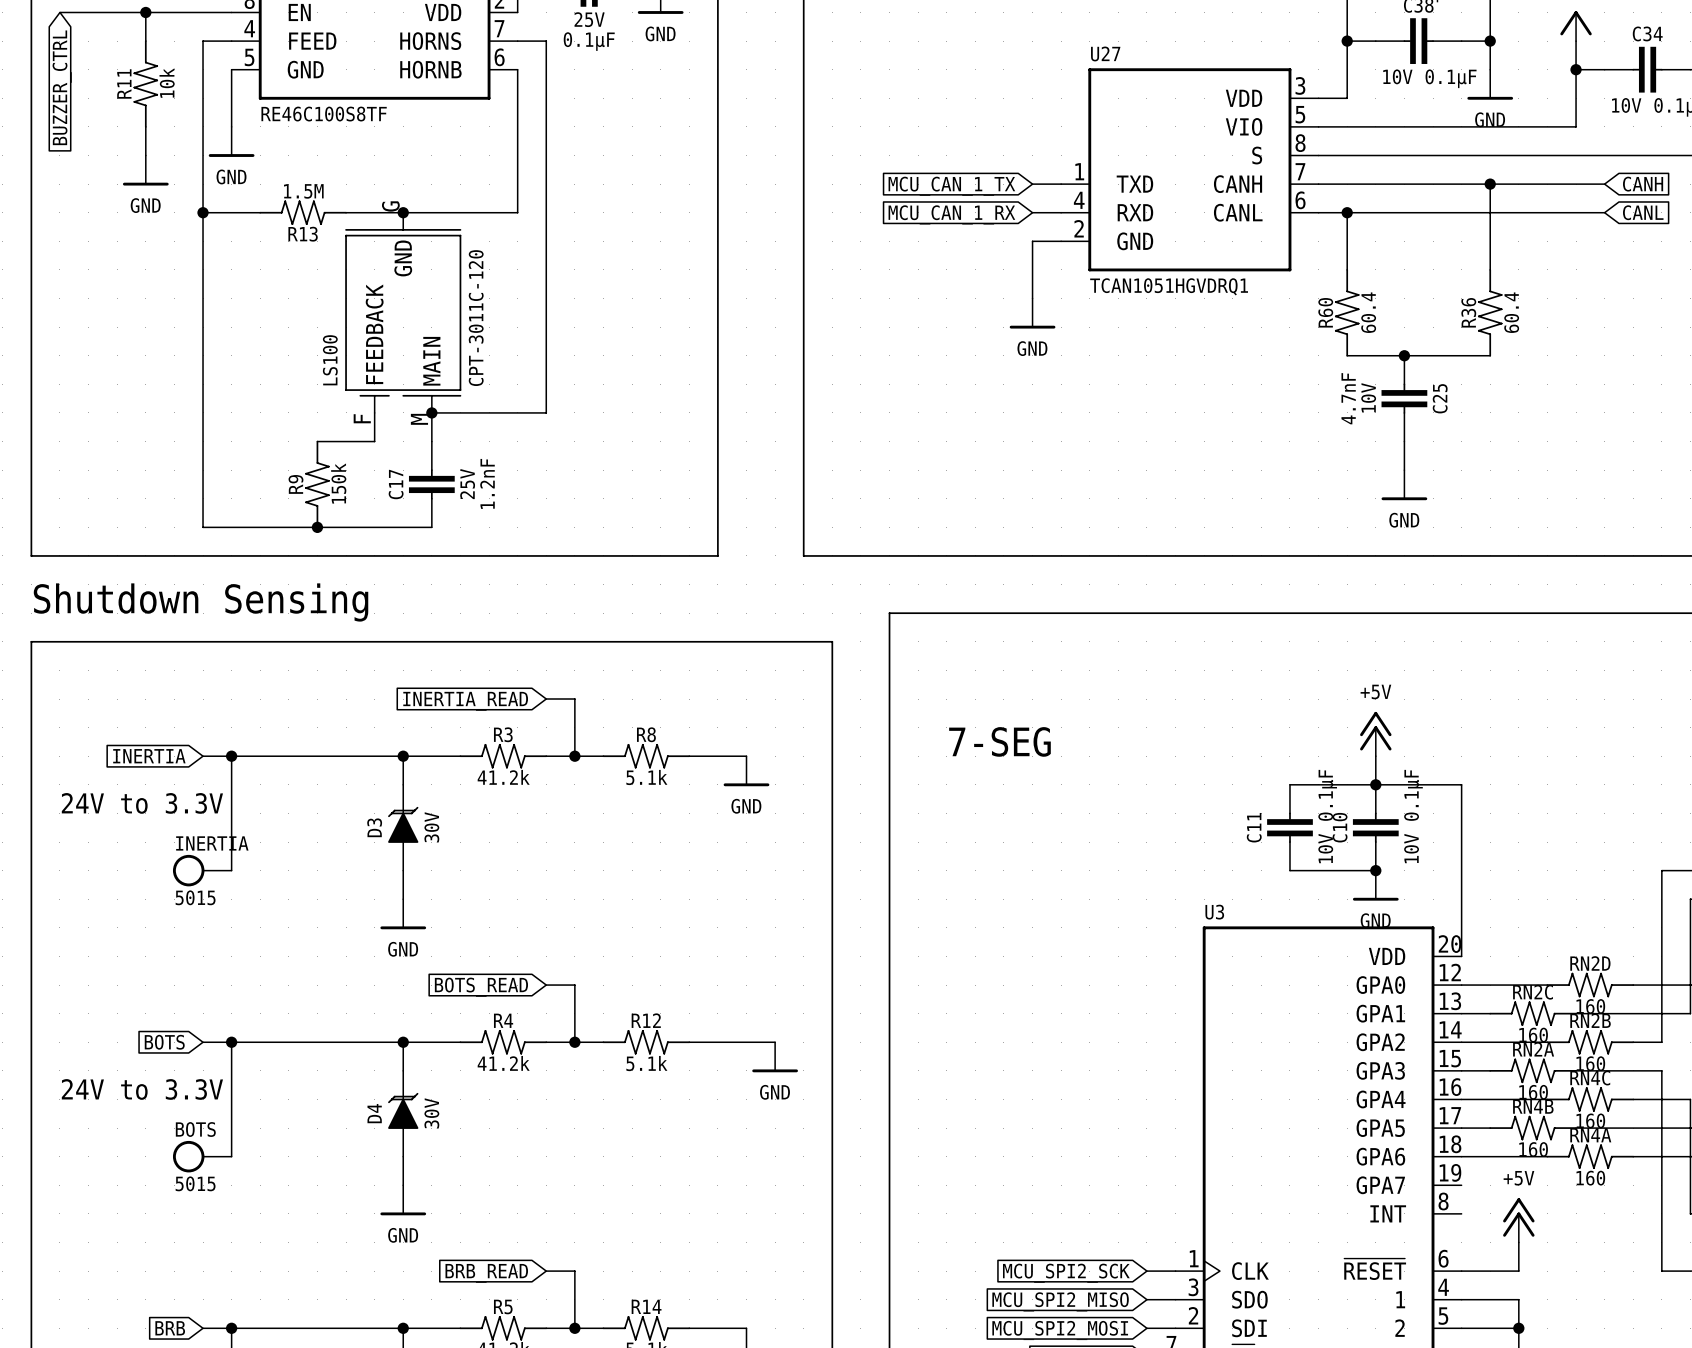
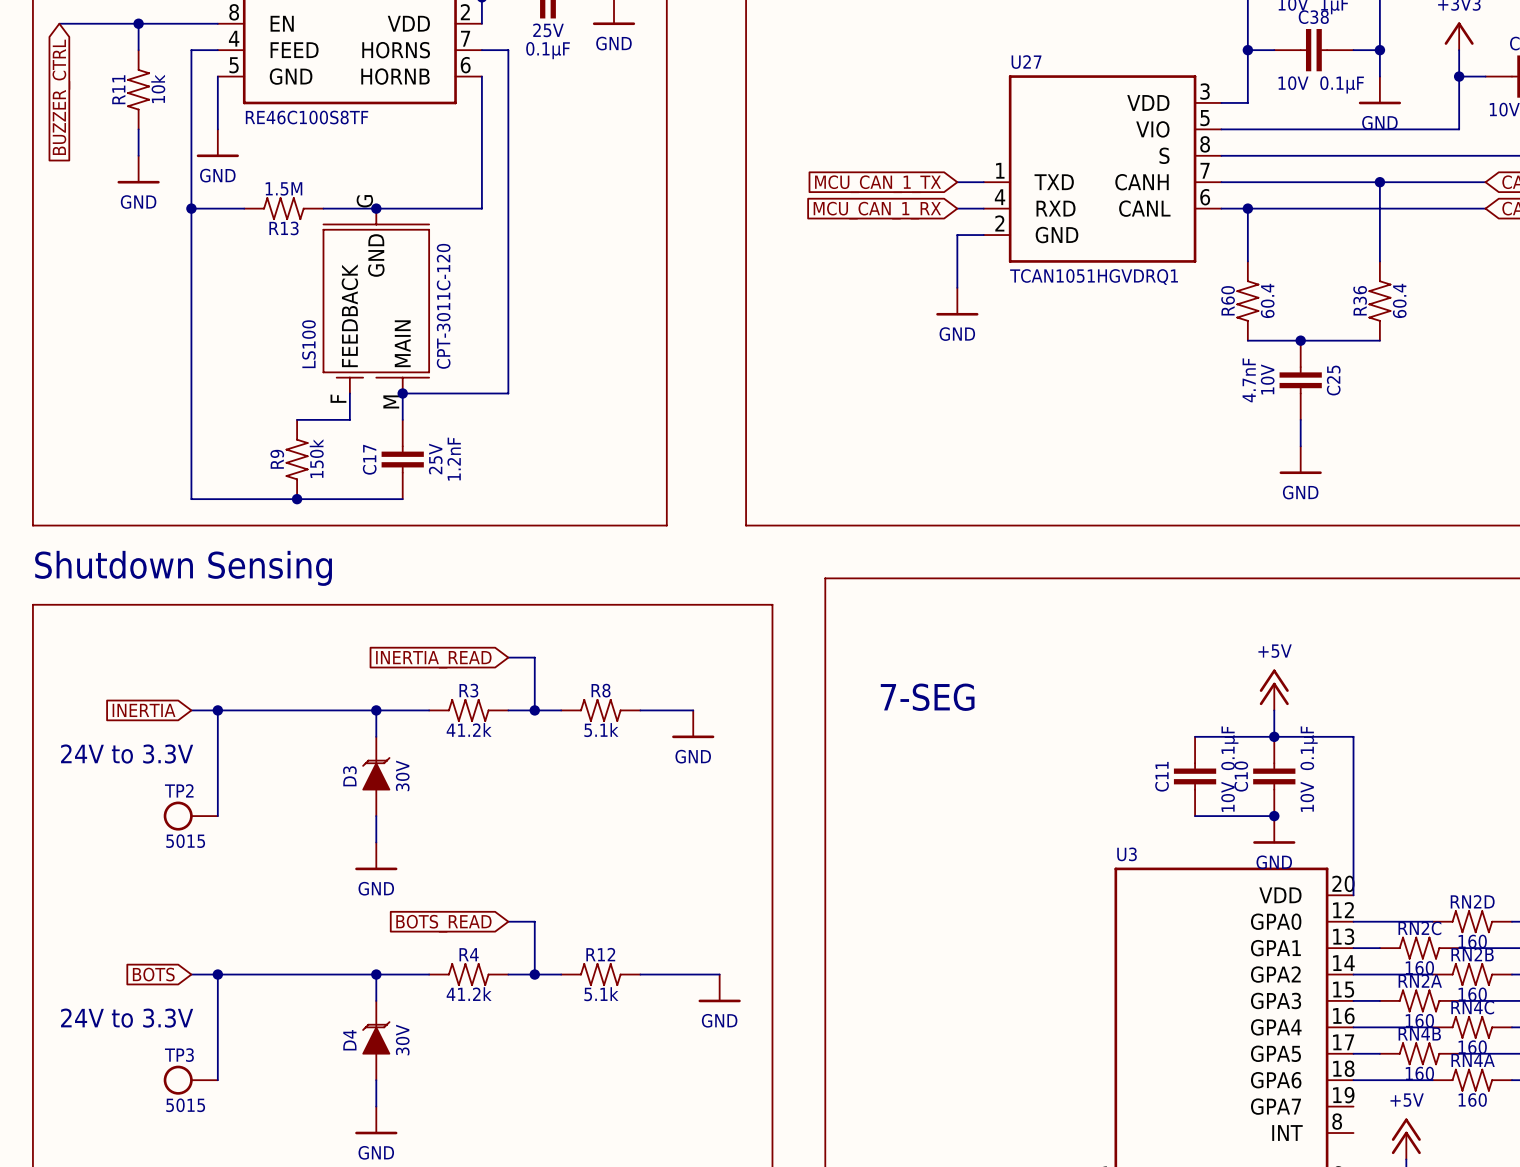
INERTIA name: INERTIA (212, 843) -> TP2 (179, 790)
BOTS name: BOTS (195, 1129) -> TP3 (179, 1055)

